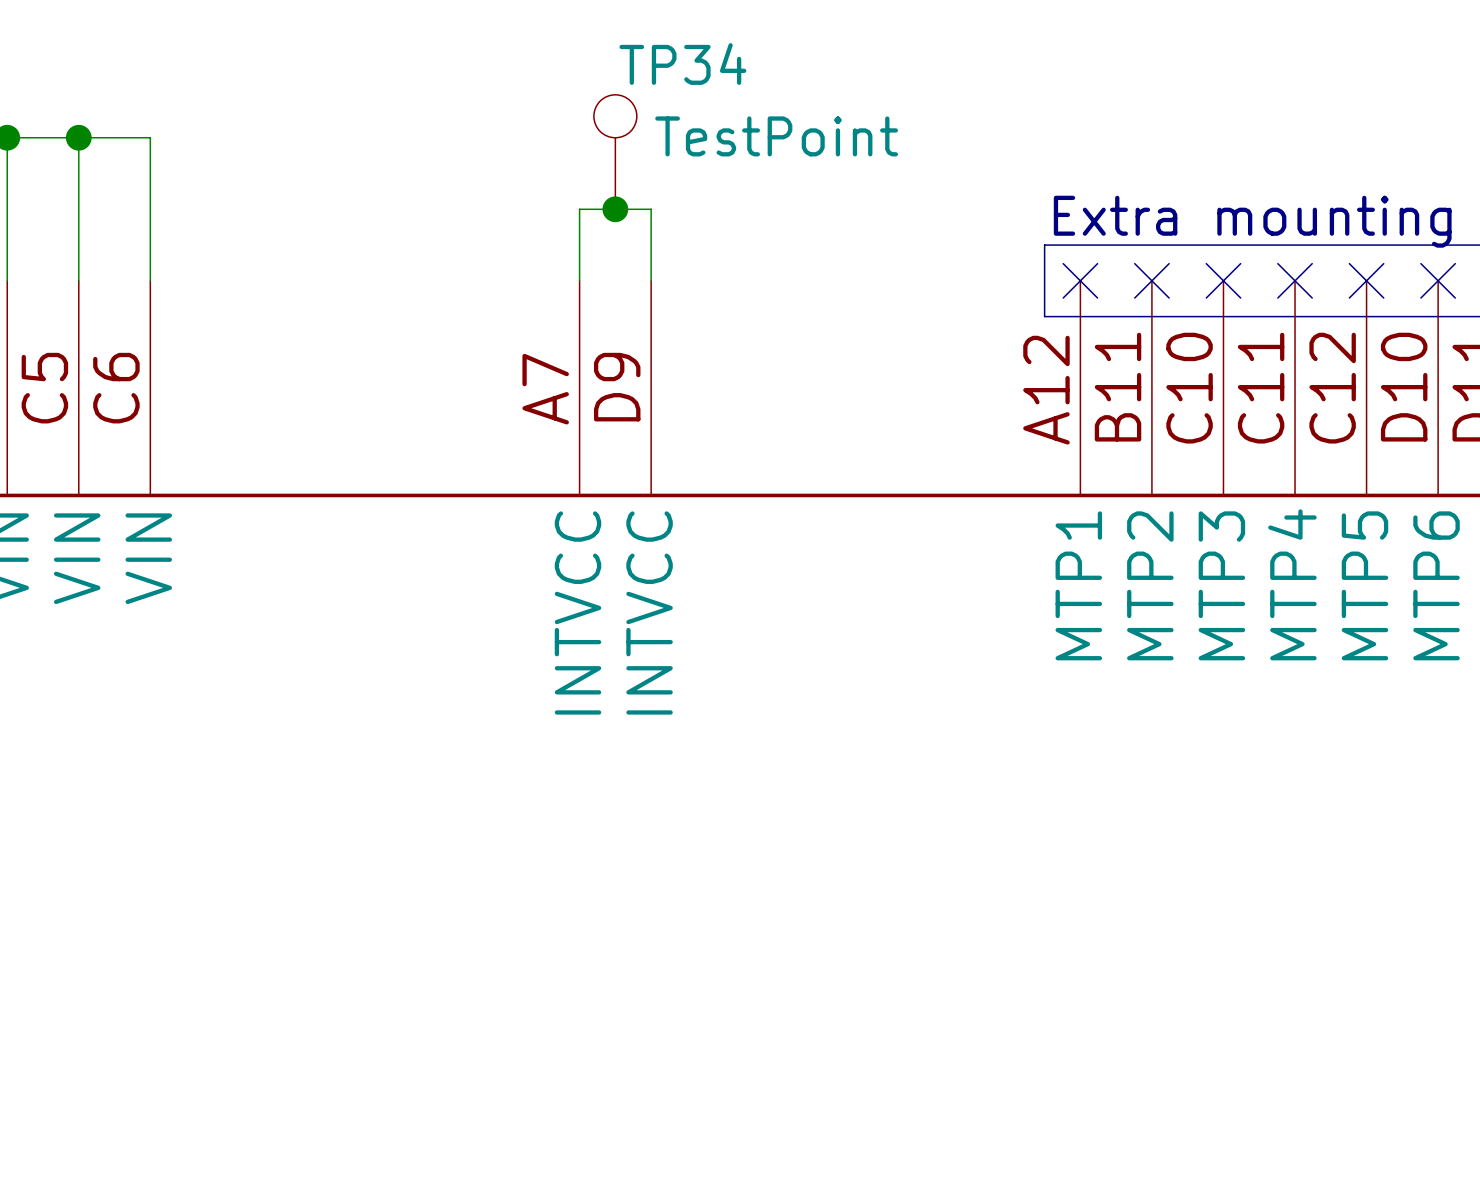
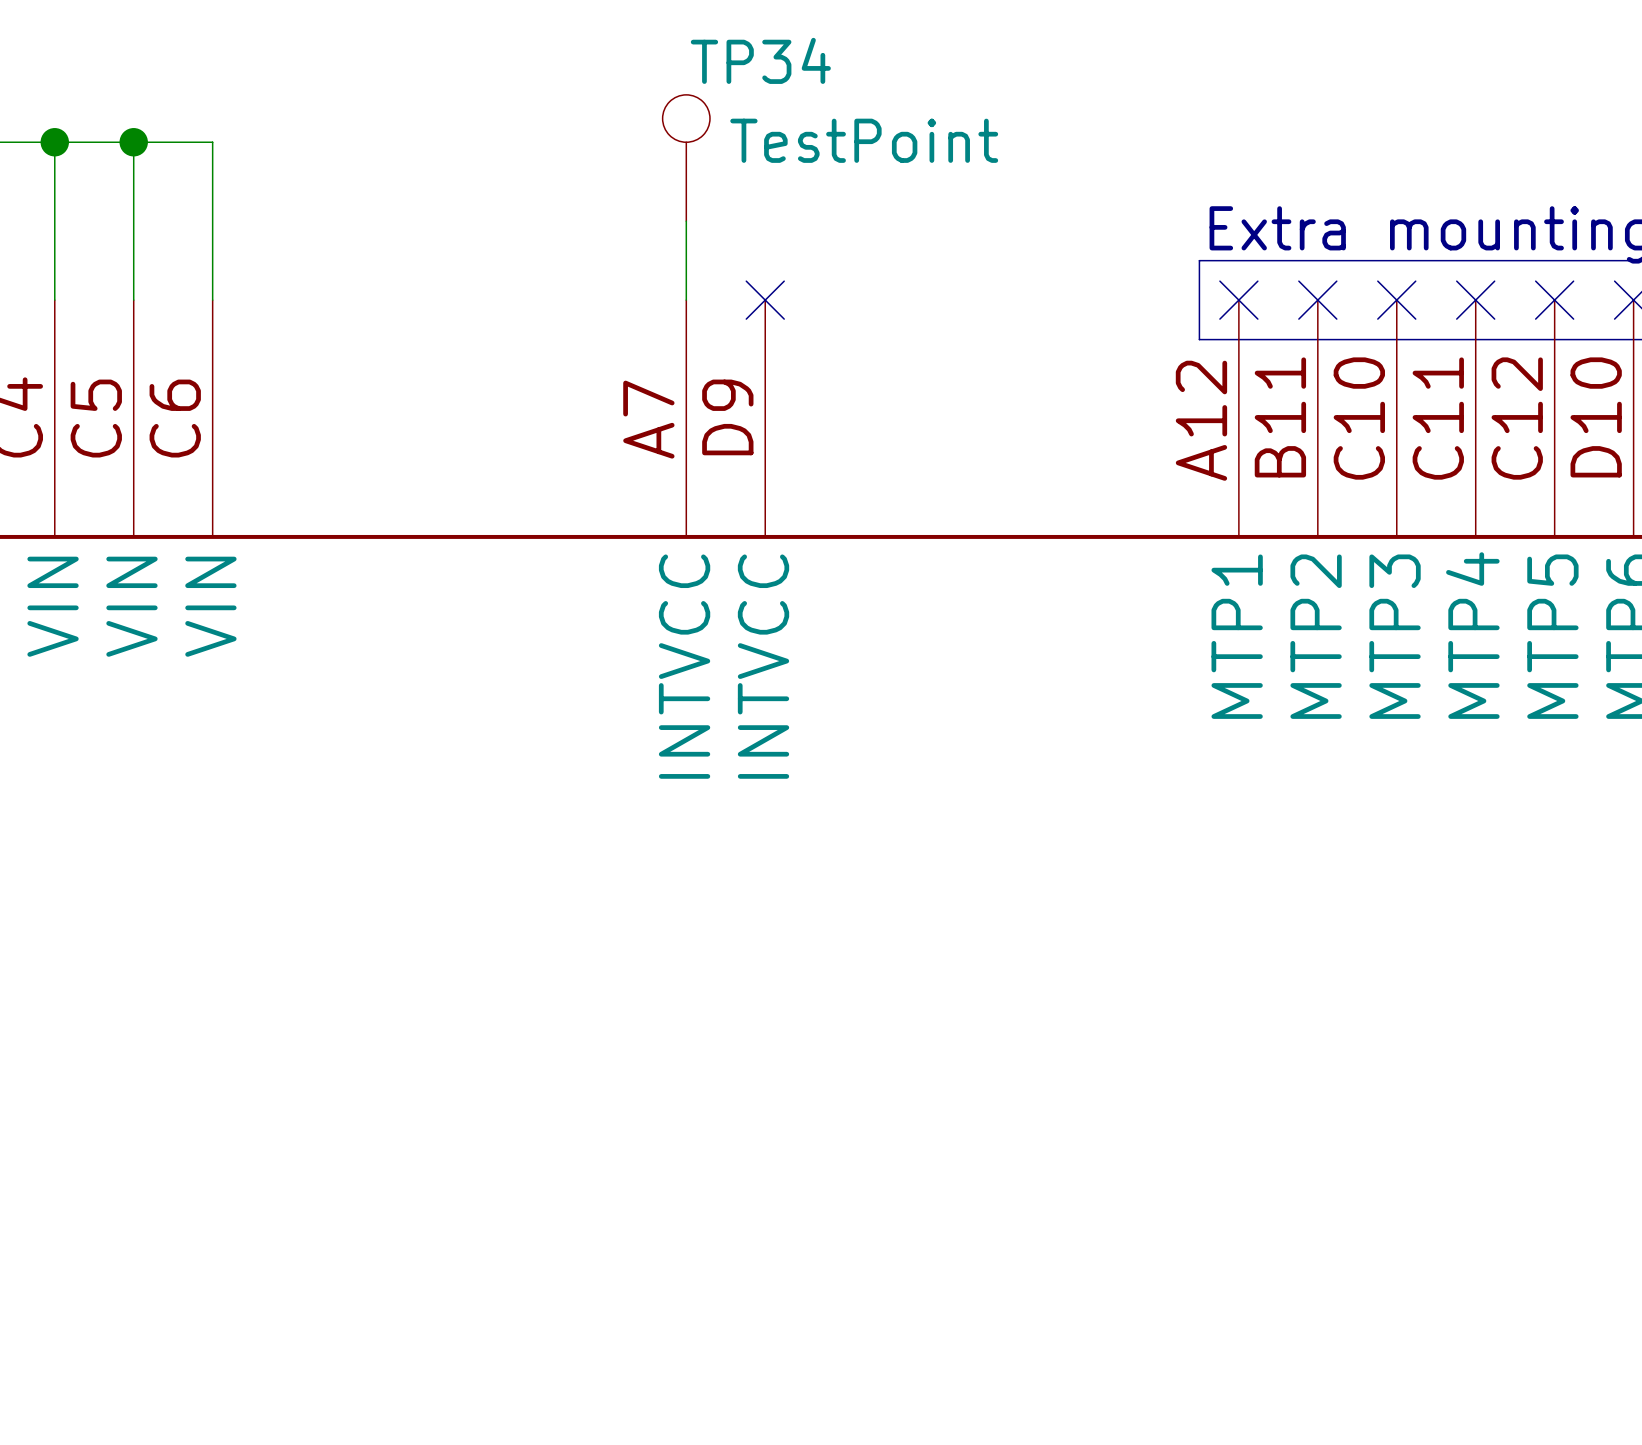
TP34 position: (615, 152) -> (686, 158)
wire: (579, 209) (651, 209) (651, 280) -> none
junction: (615, 209) -> none
no-connect mark: none -> (765, 300)

